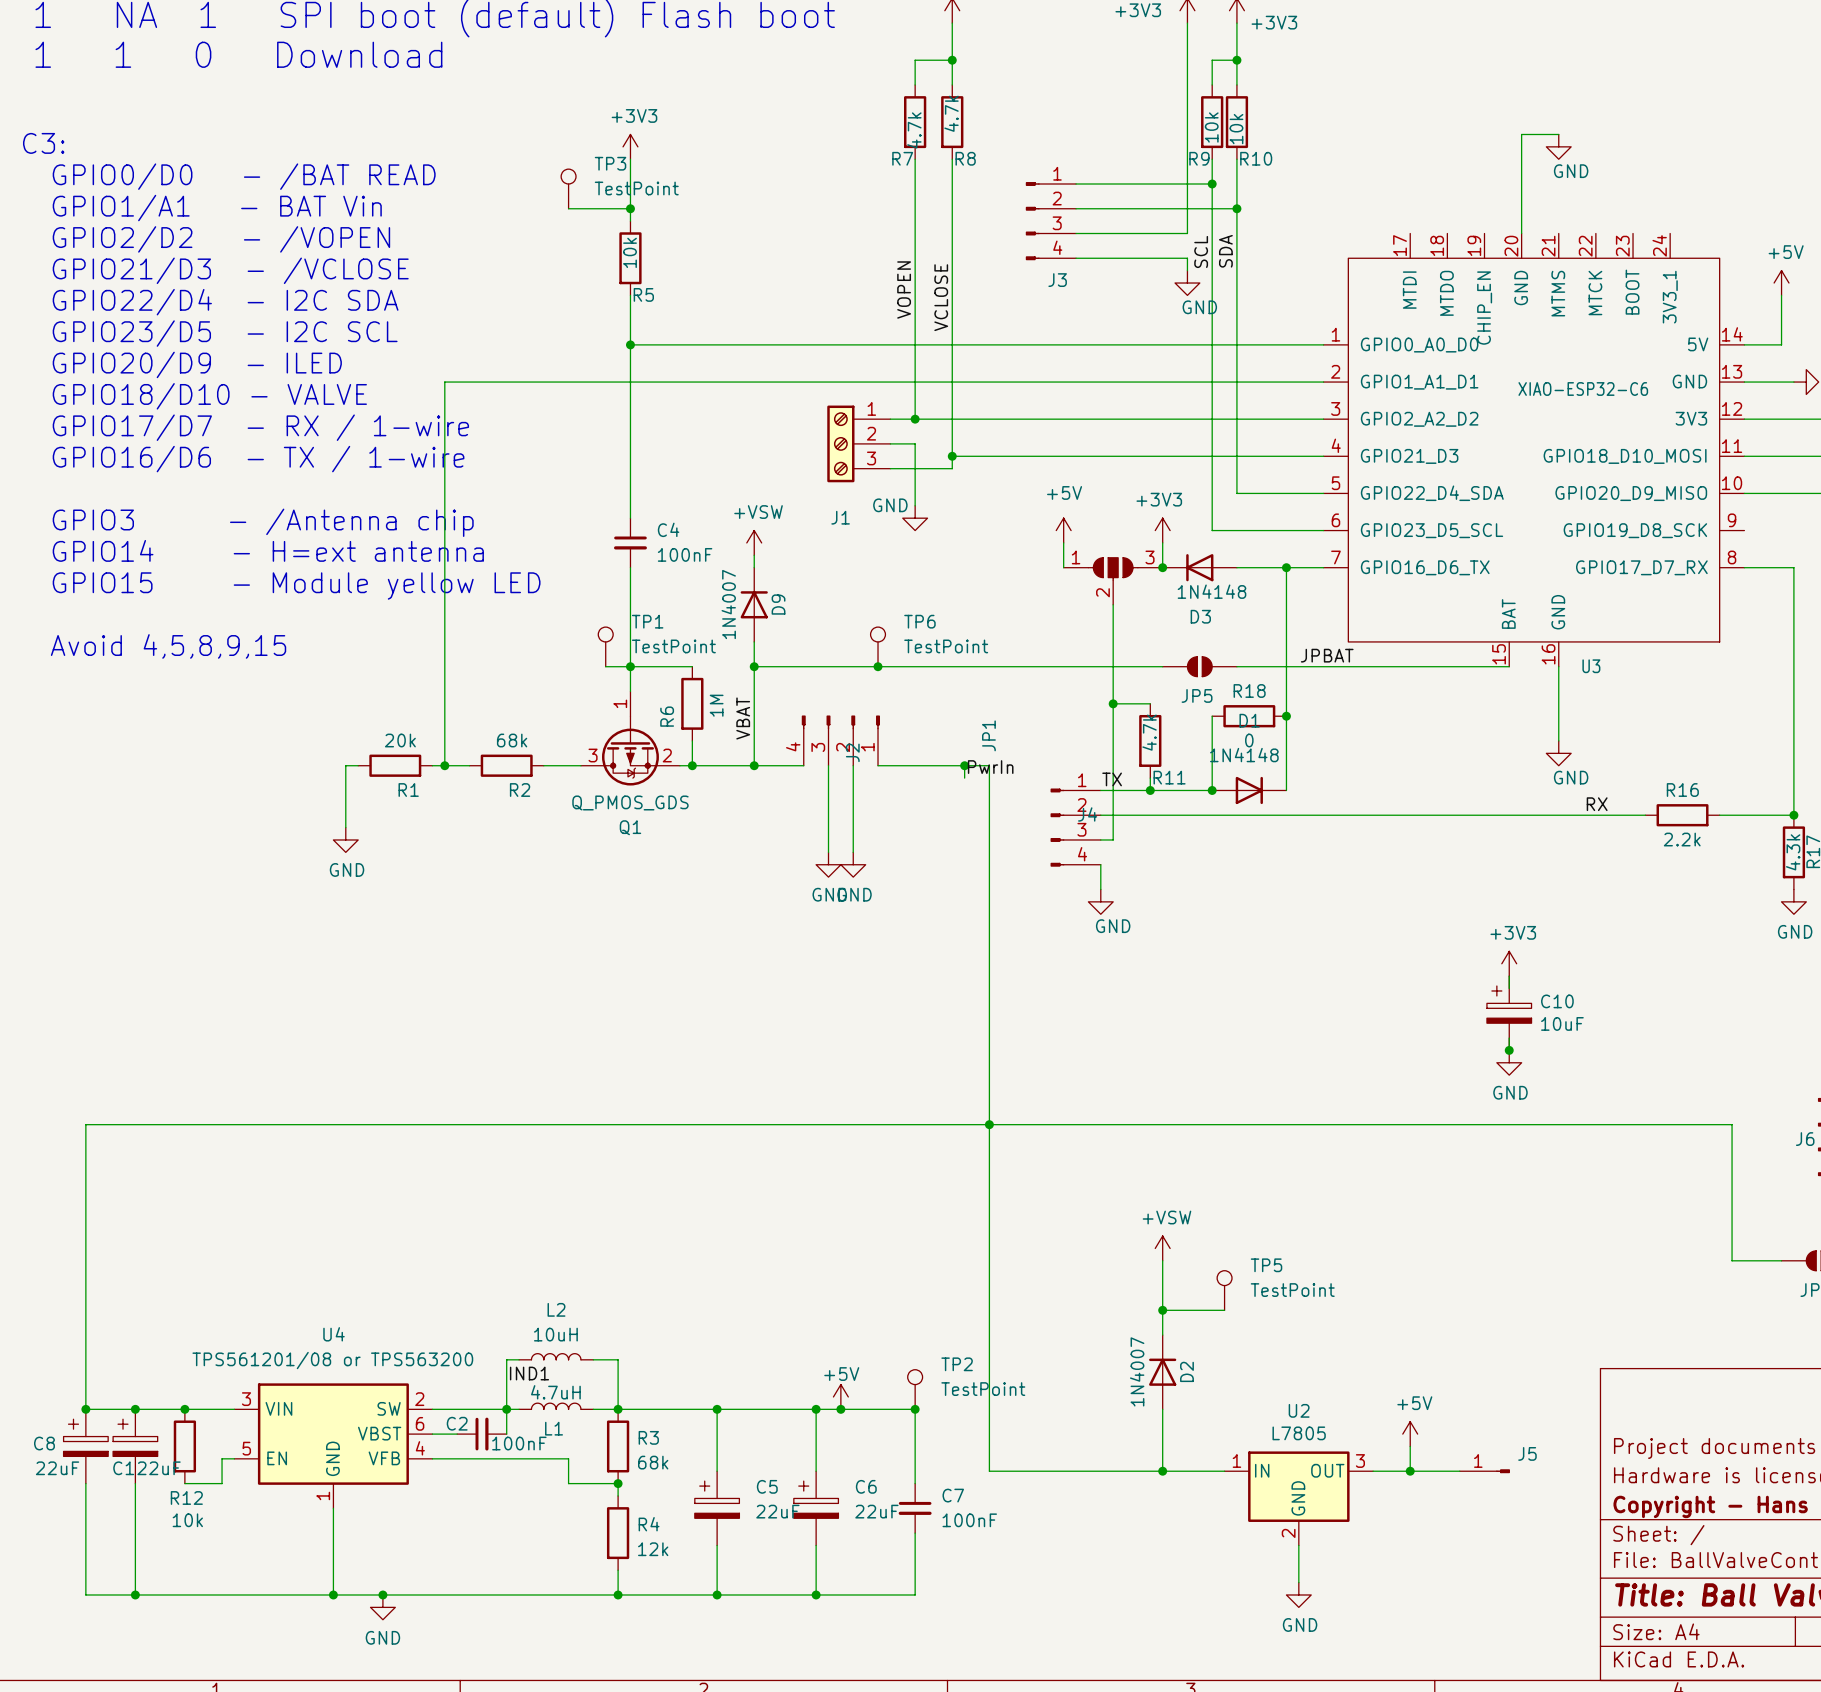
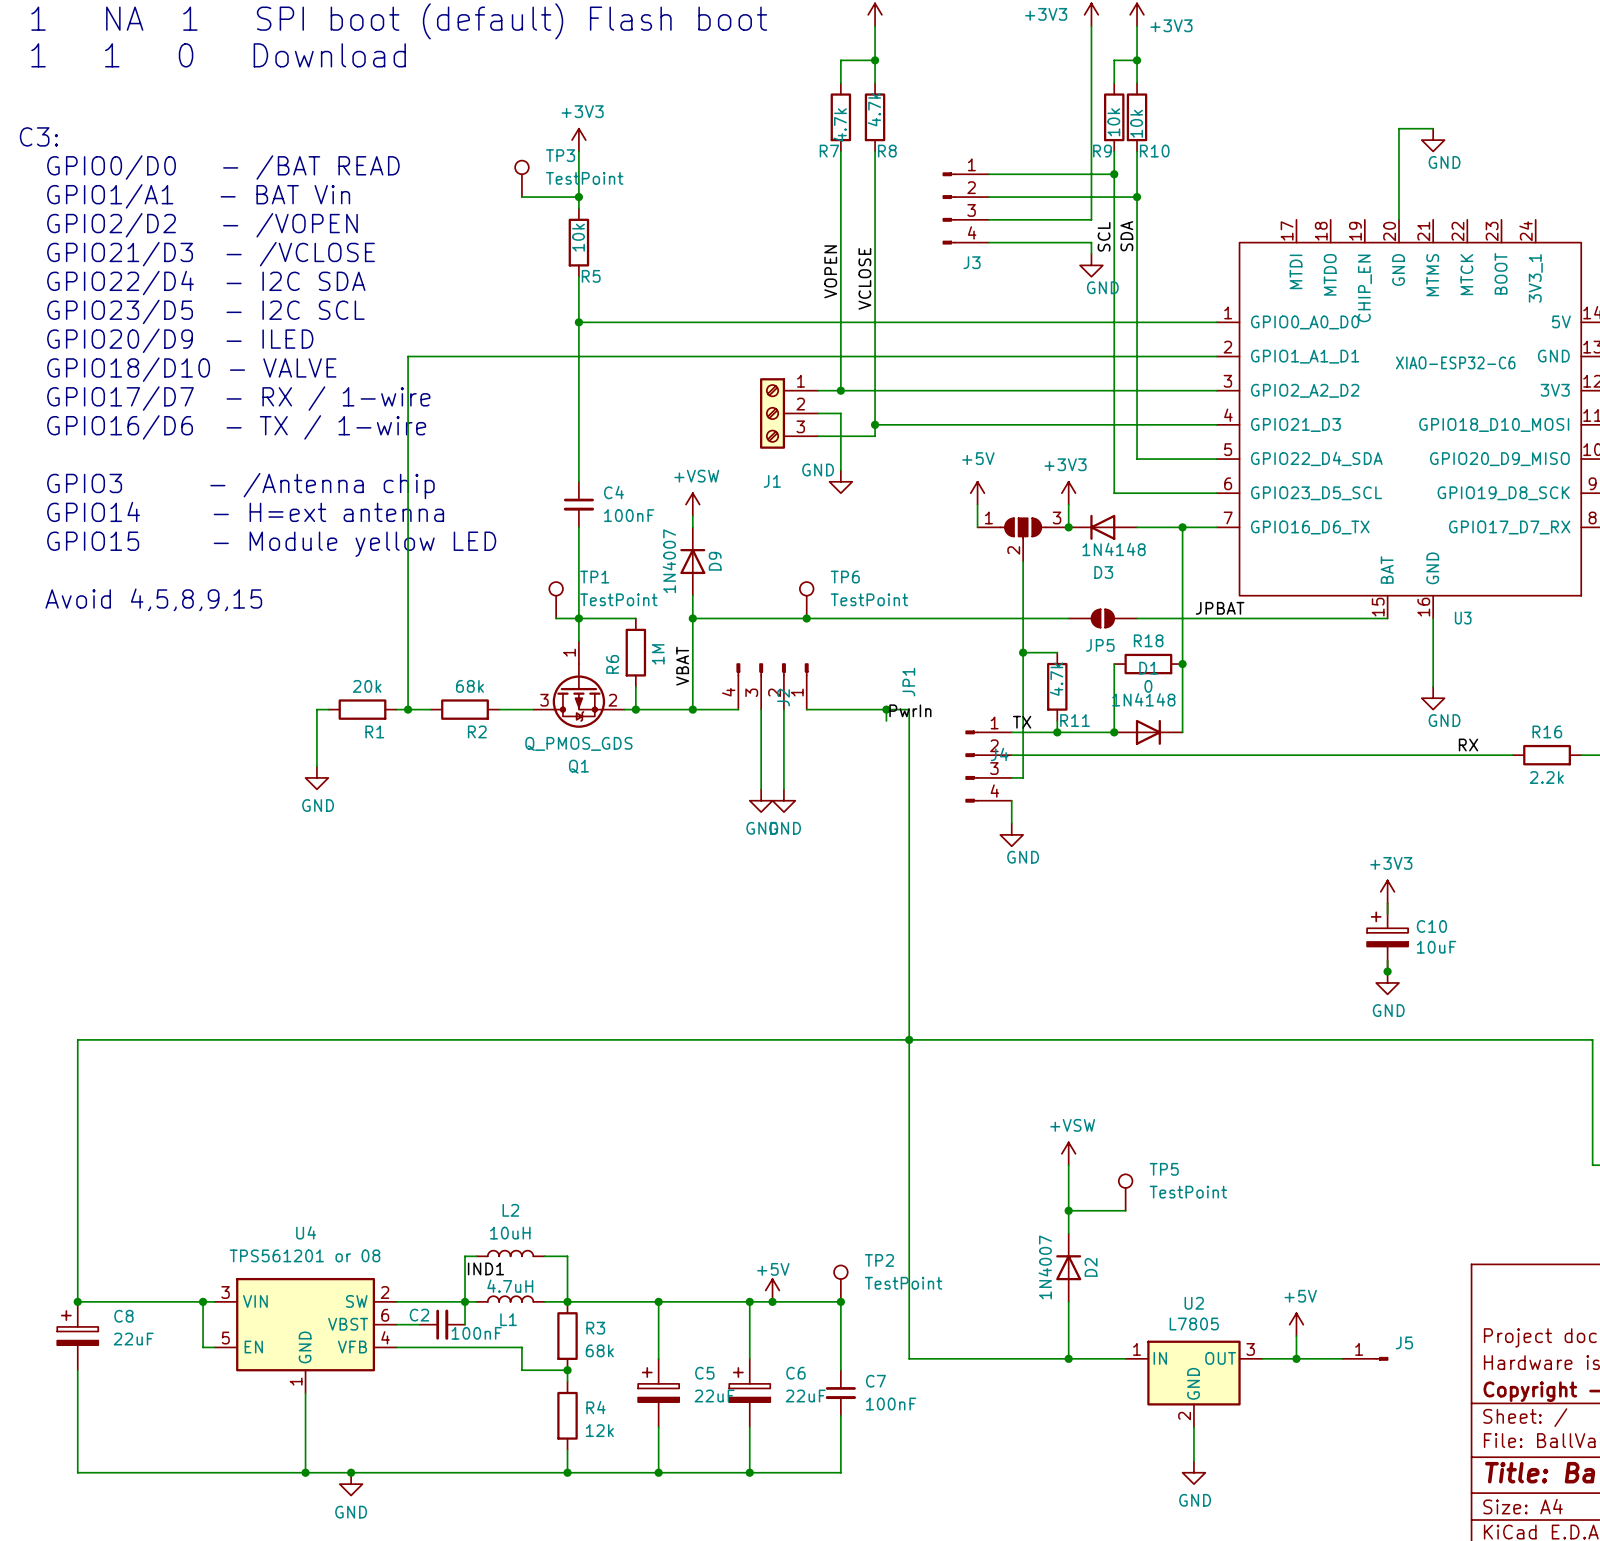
U4 value: TPS561201/08 or TPS563200 (332, 1360) -> TPS561201 or 08 (305, 1255)
junction: (135, 1409) -> none
junction position: (184, 1409) -> (203, 1301)
C8 name position: C8 (44, 1443) -> C8 (123, 1316)
C1: 22uF (135, 1446) -> none
R12: 10k (184, 1446) -> none
wire: (222, 1458) (222, 1483) (184, 1483) -> (203, 1347) (203, 1301)
C8 value position: 22uF (57, 1468) -> 22uF (133, 1339)
wire: (135, 1483) (135, 1594) -> none
junction: (135, 1594) -> none

